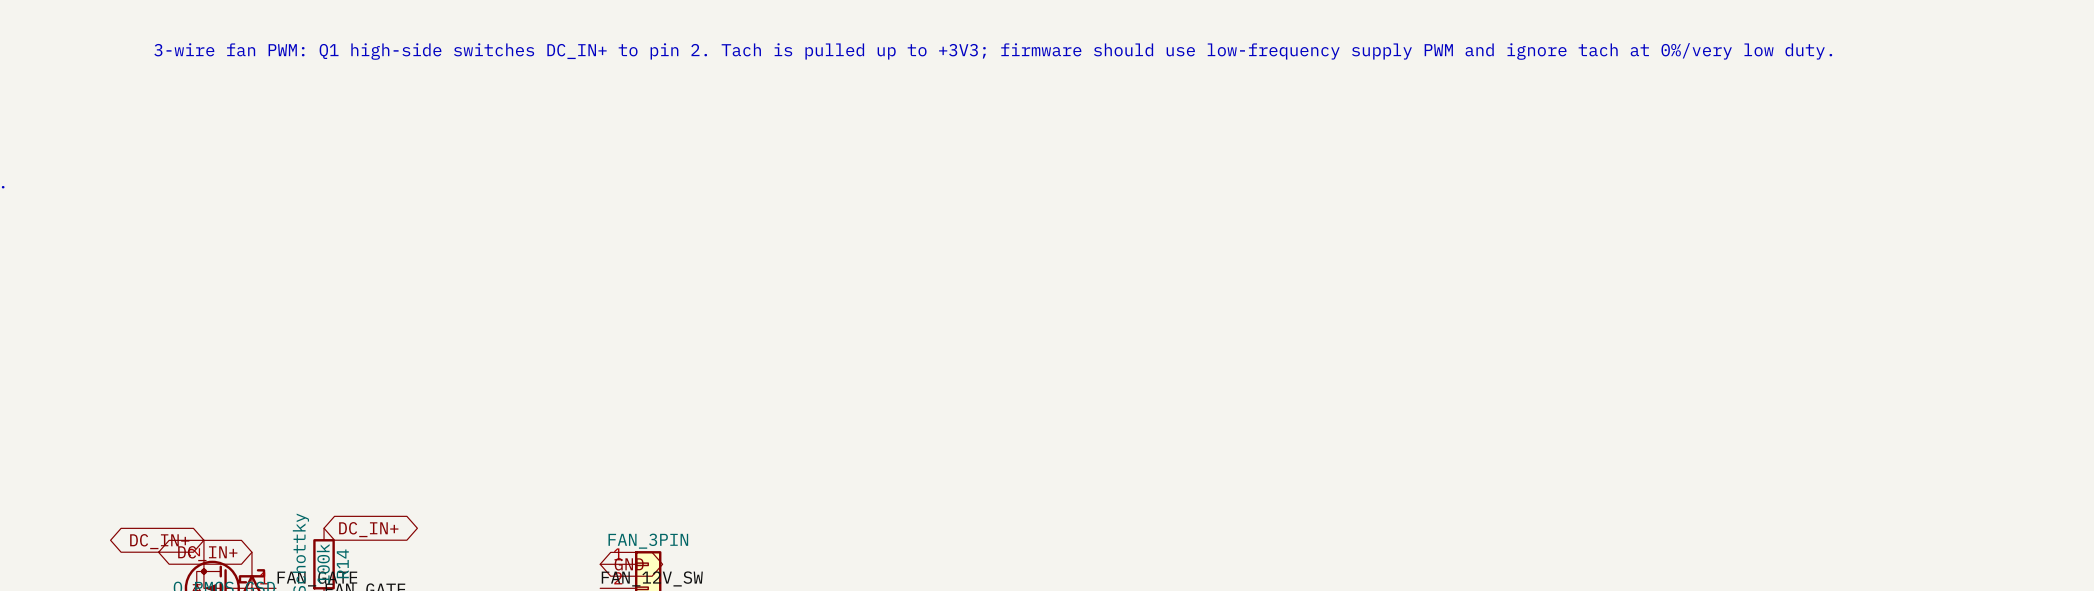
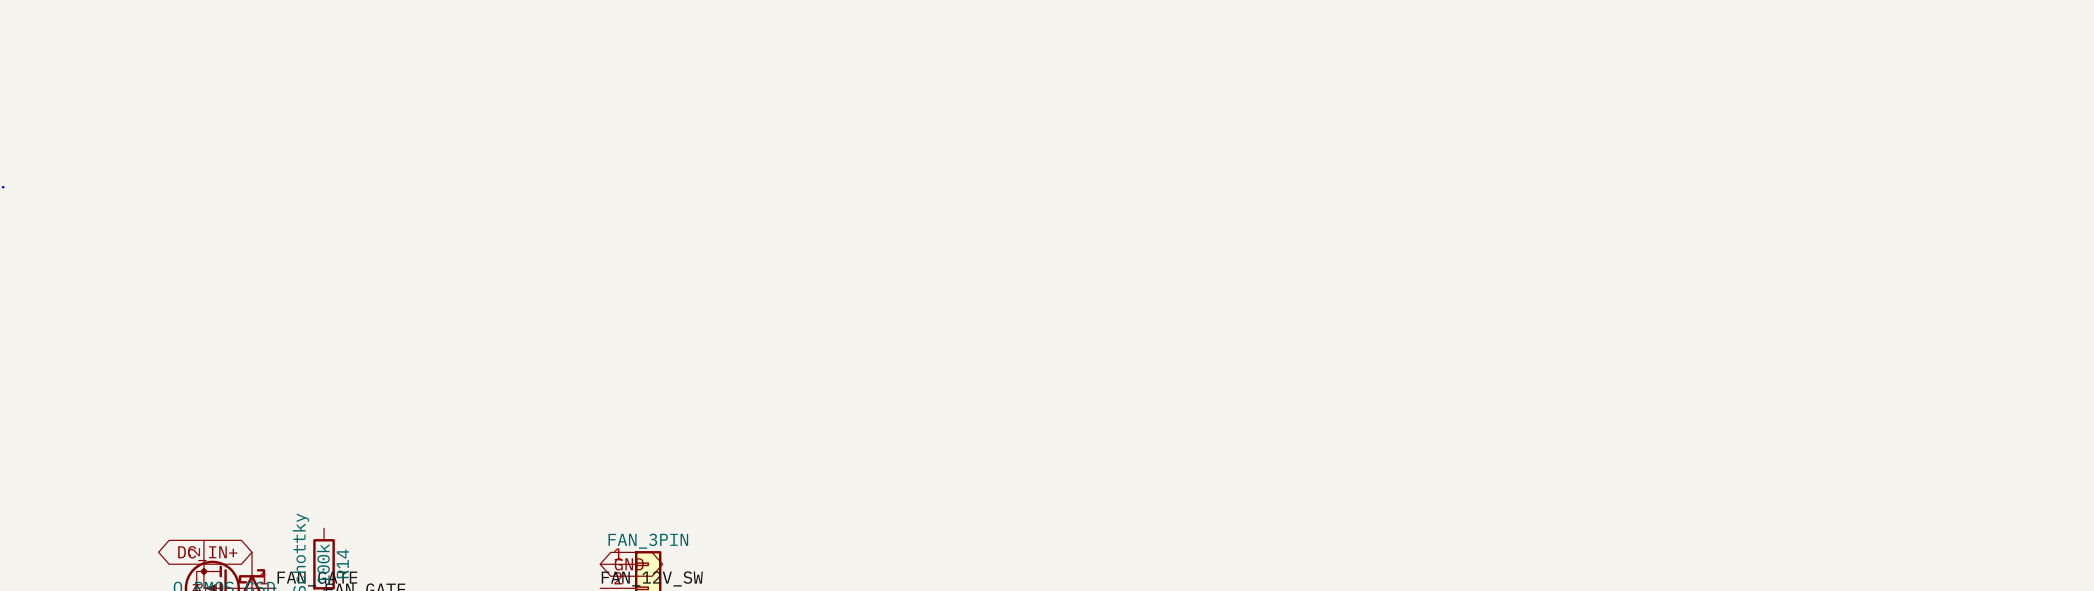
text: 3-wire fan PWM: Q1 high-side switches DC_IN+ to pin 2. Tach is pulled up to +3V3; firmware should use low-frequency supply PWM and ignore tach at 0%/very low duty. (993, 51) -> none
global label: DC_IN+ (368, 529) -> none
global label: DC_IN+ (159, 541) -> none

